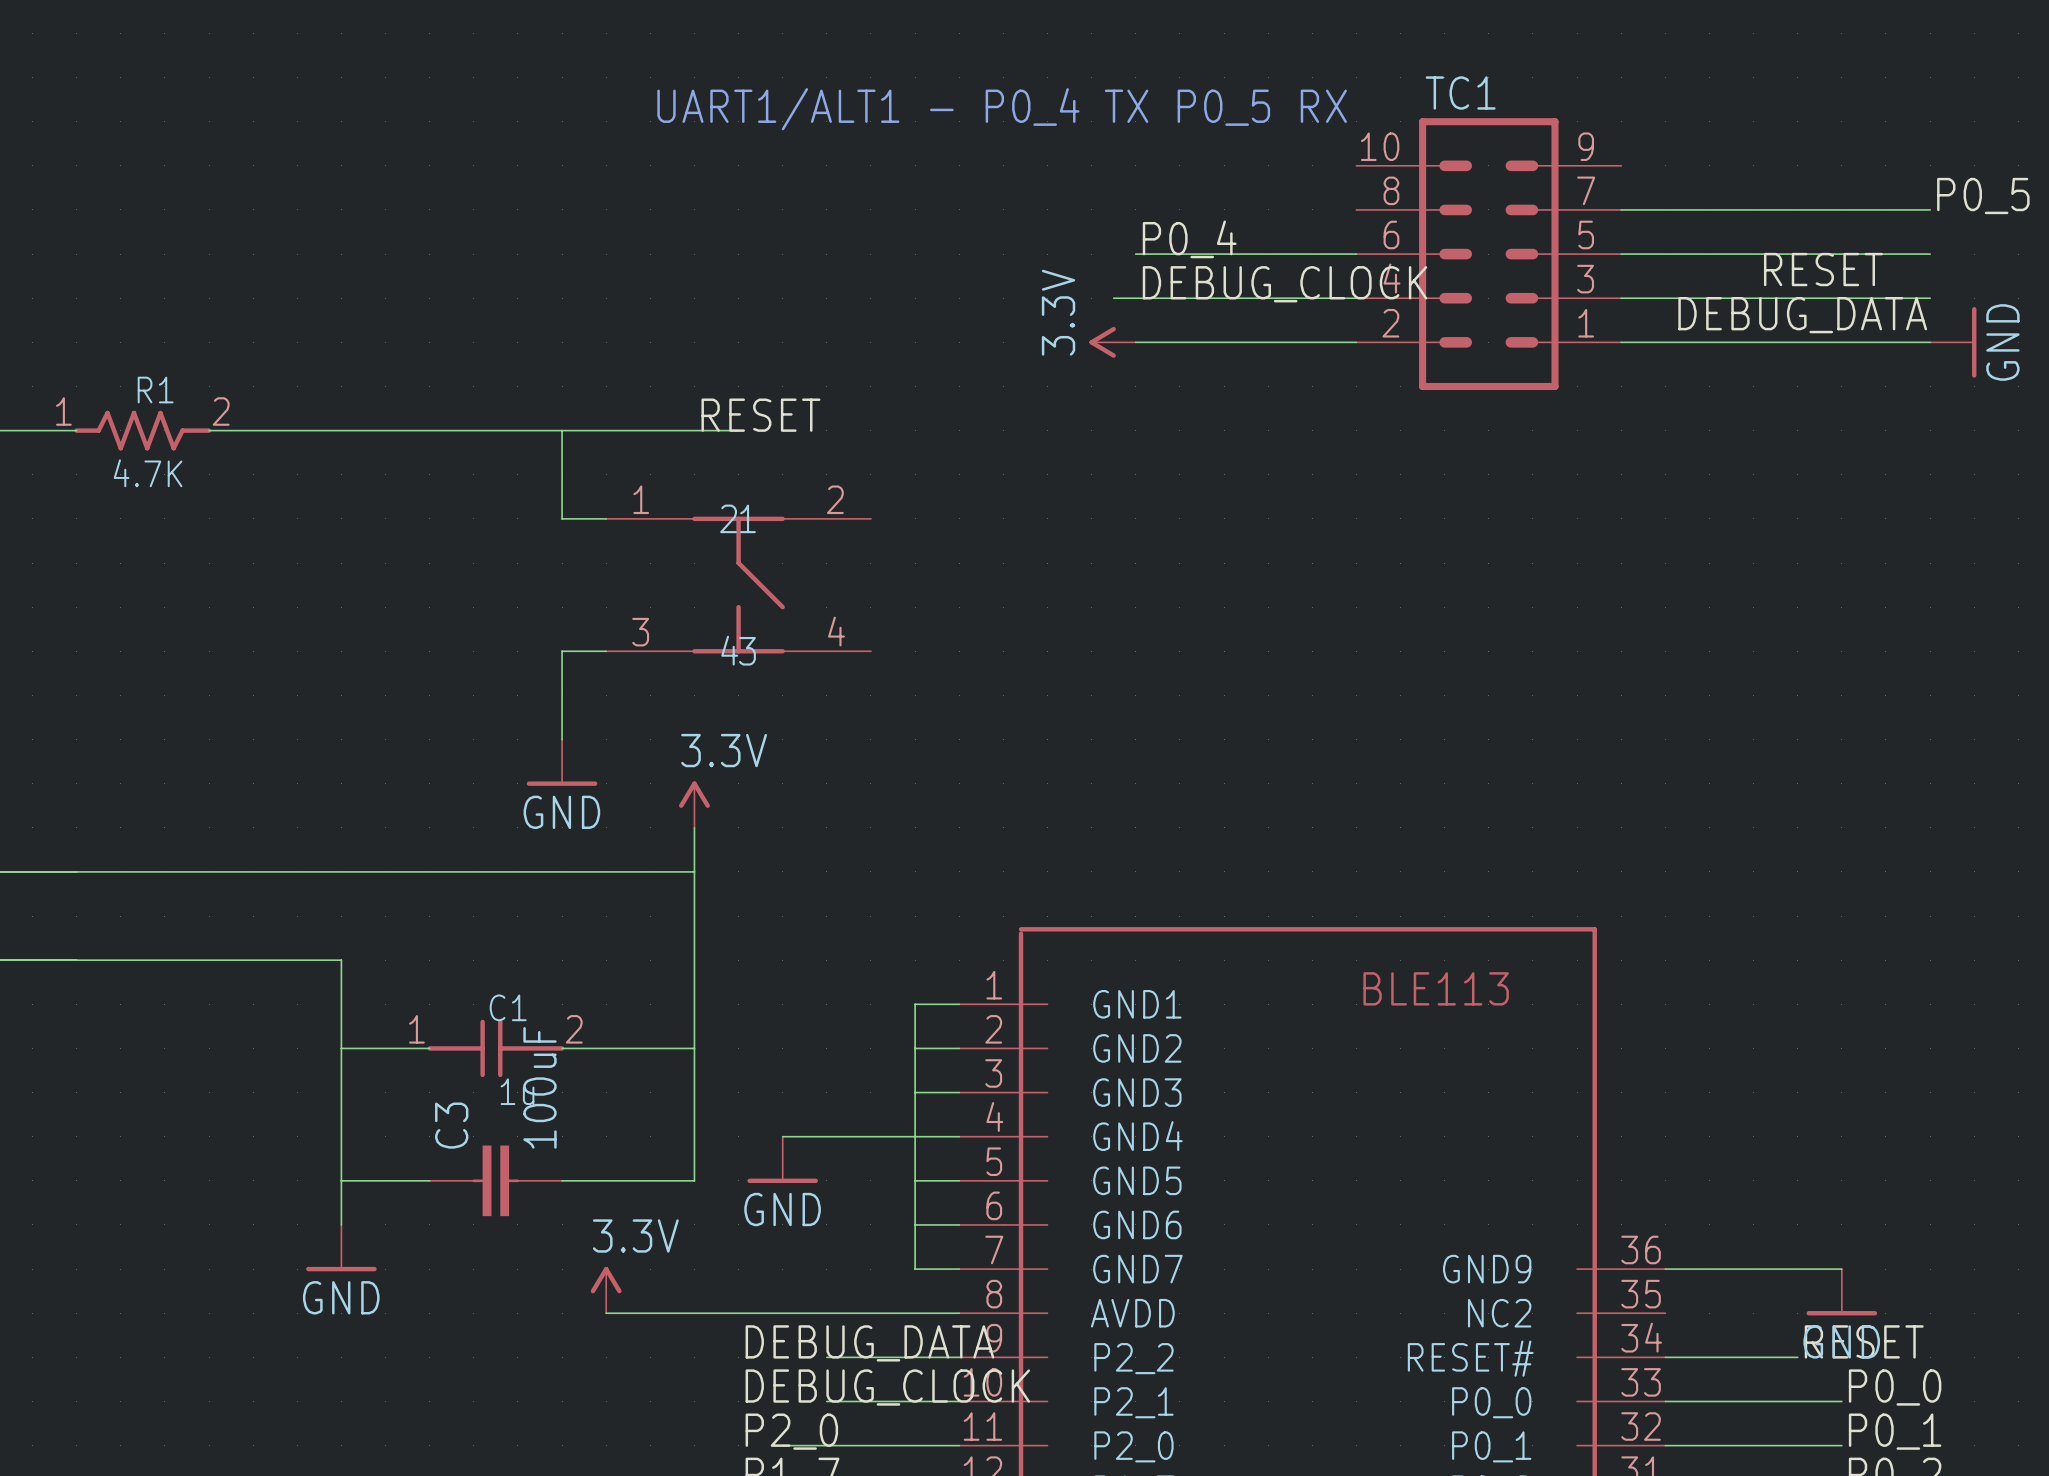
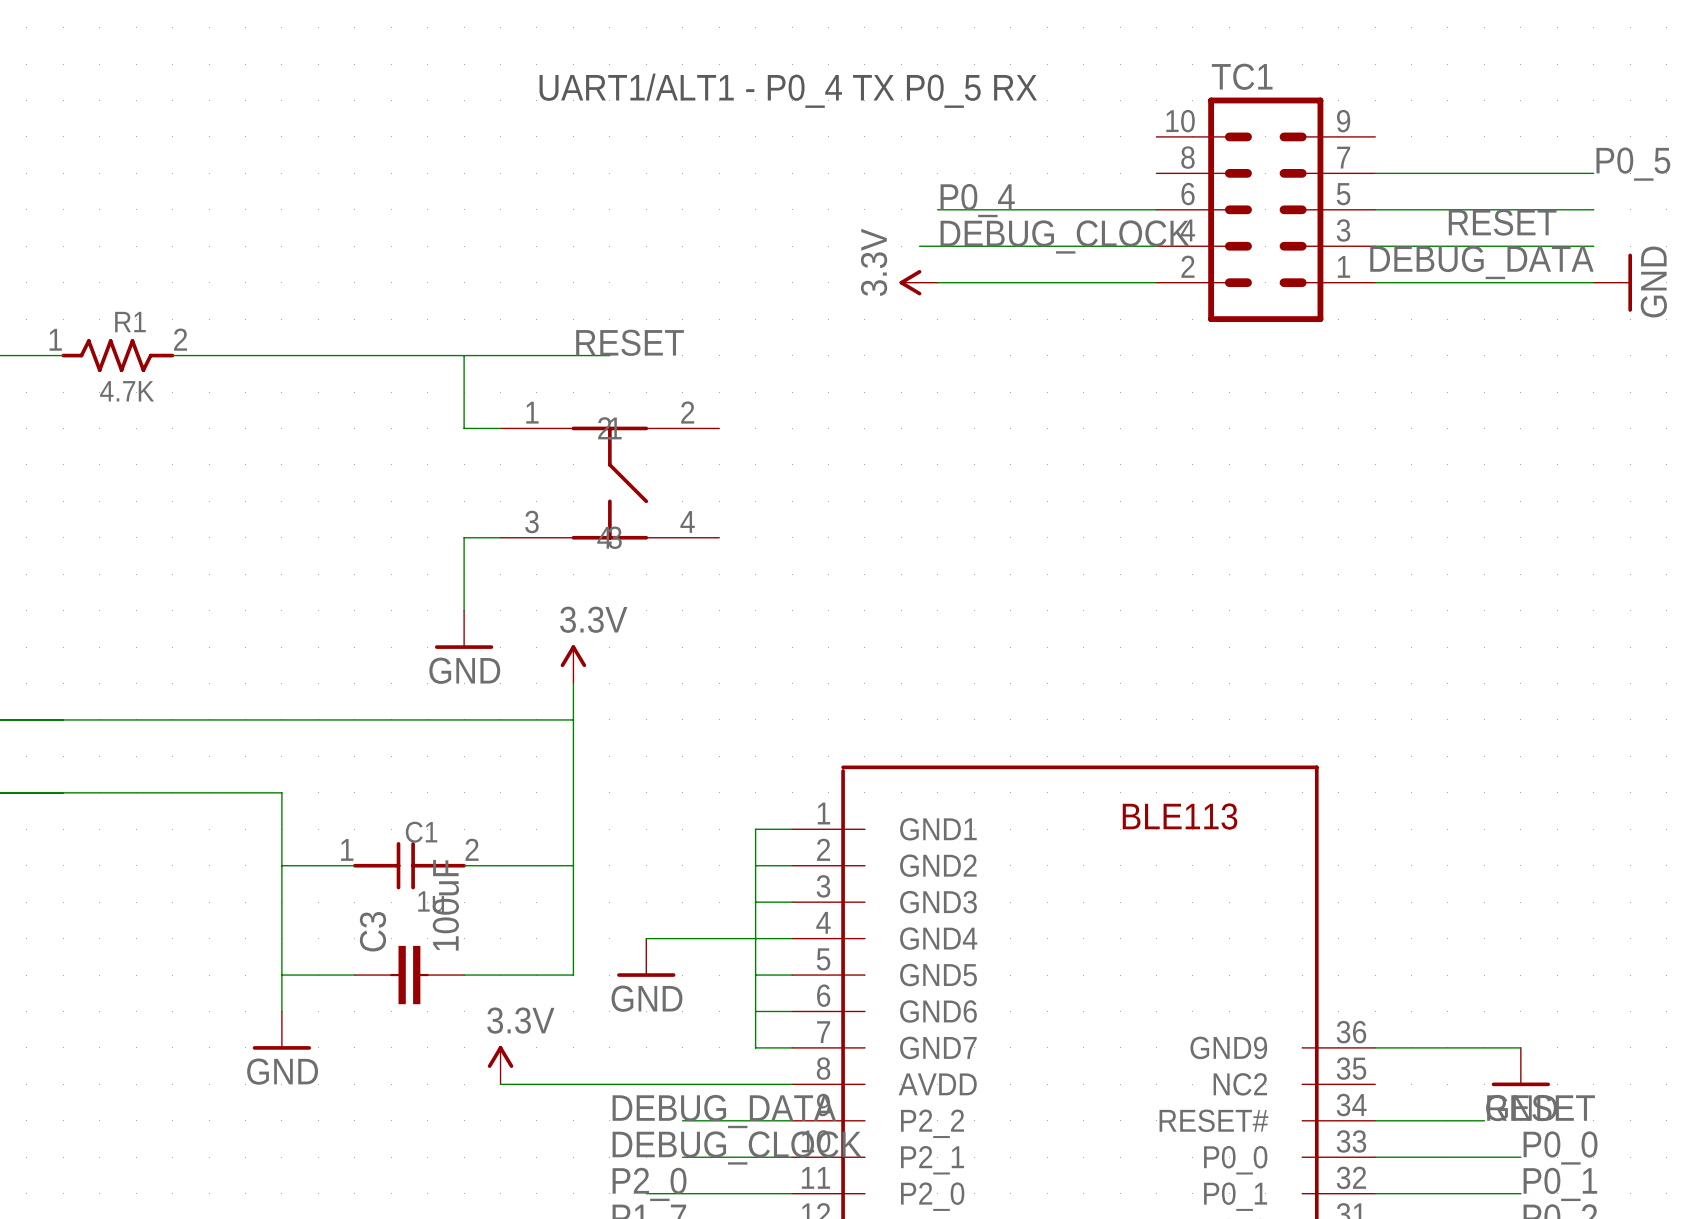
TC1 position: (1488, 254) -> (1265, 209)

